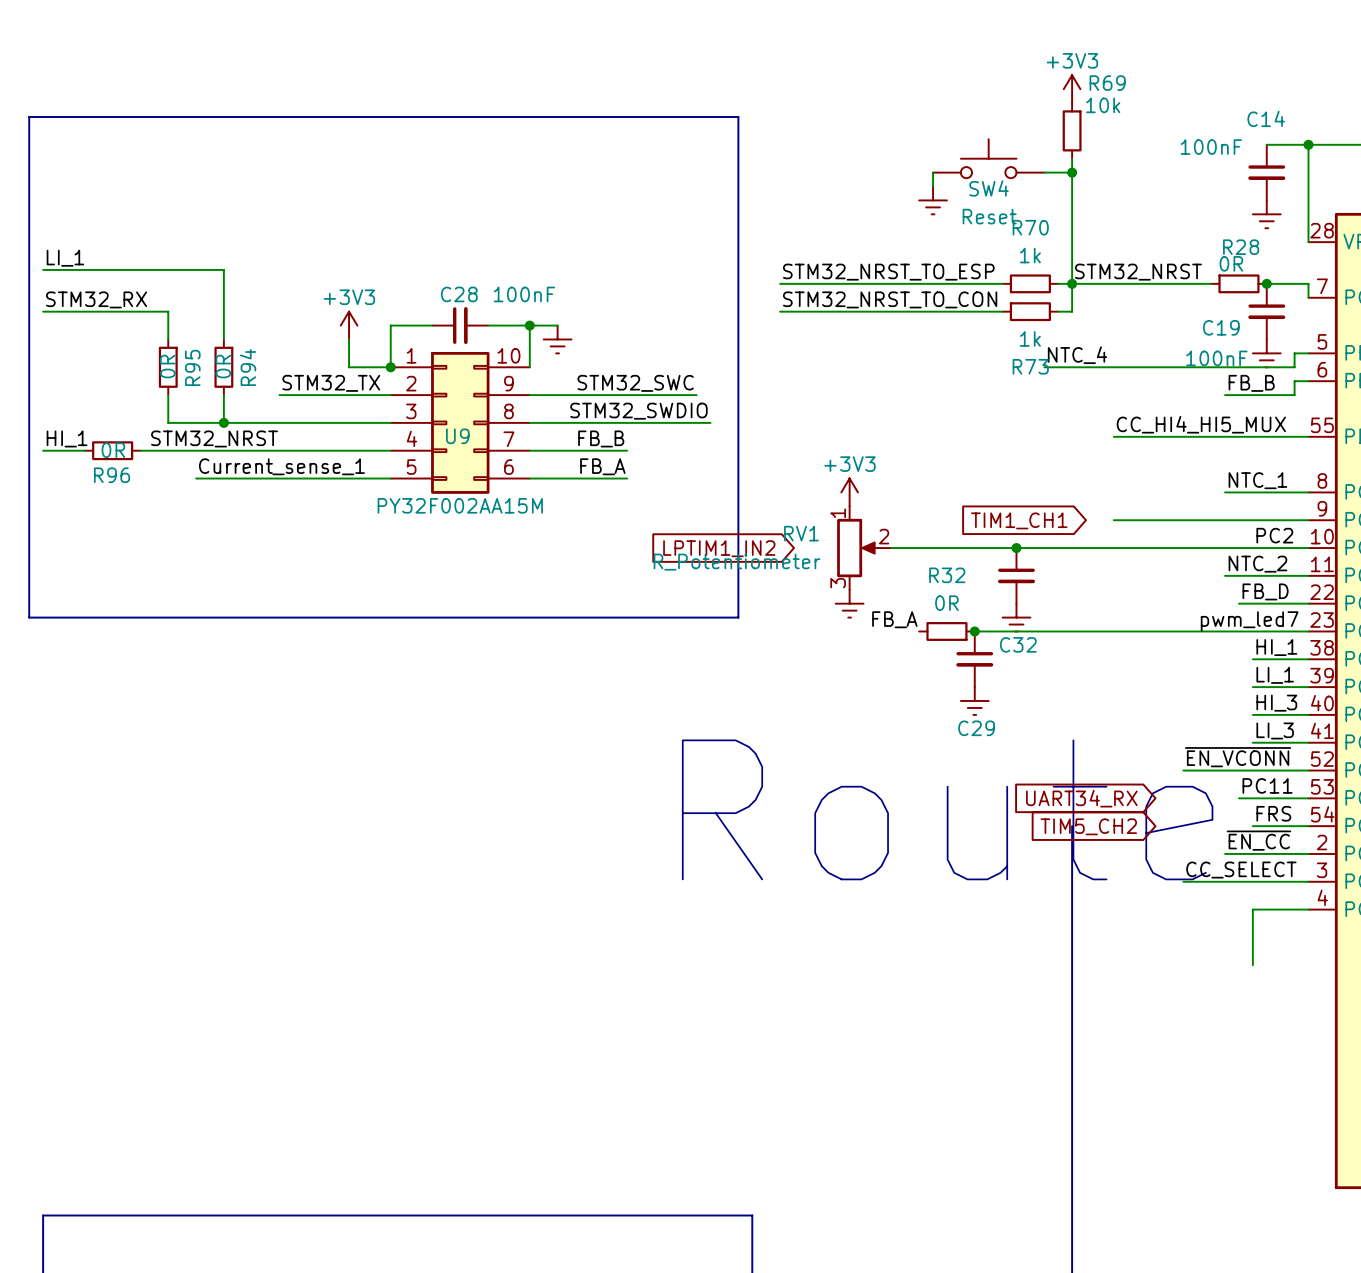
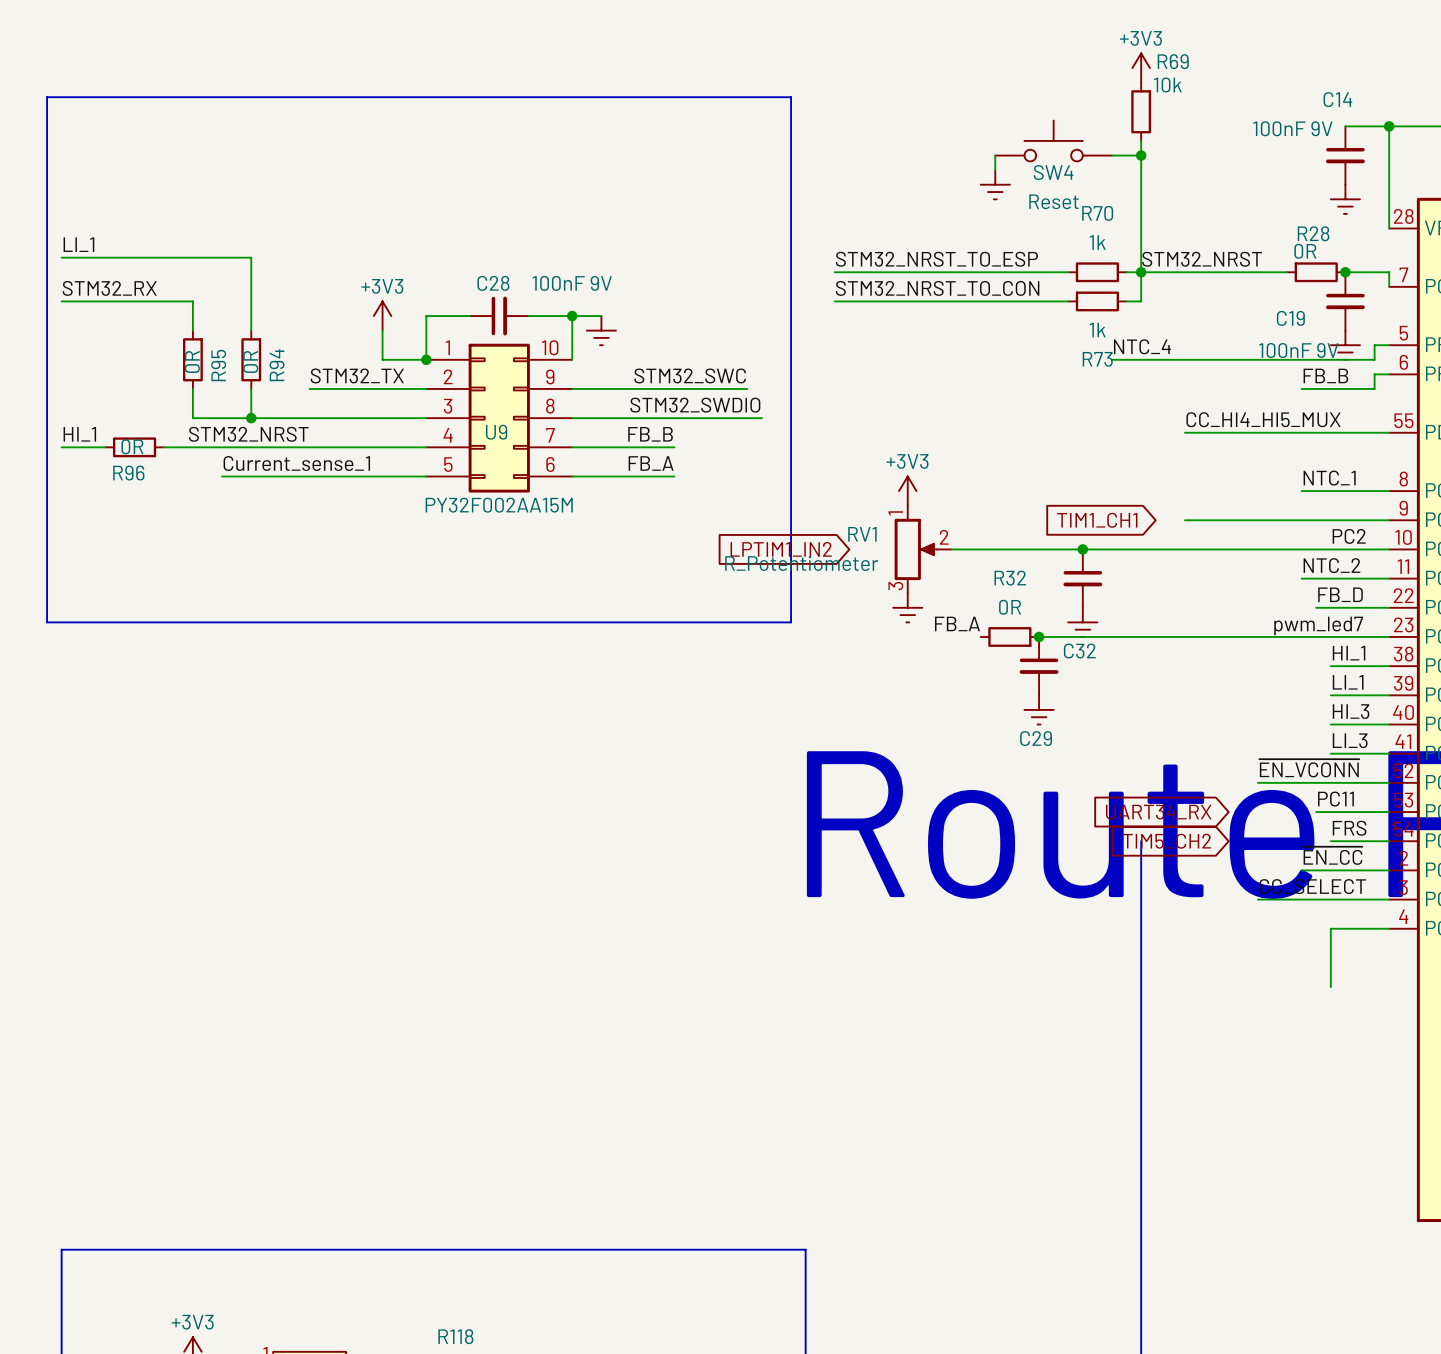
C14 value: 100nF (1211, 147) -> 100nF 9V (1292, 128)
C28 value: 100nF (524, 294) -> 100nF 9V (572, 283)
C19 value: 100nF (1216, 358) -> 100nF 9V (1298, 350)

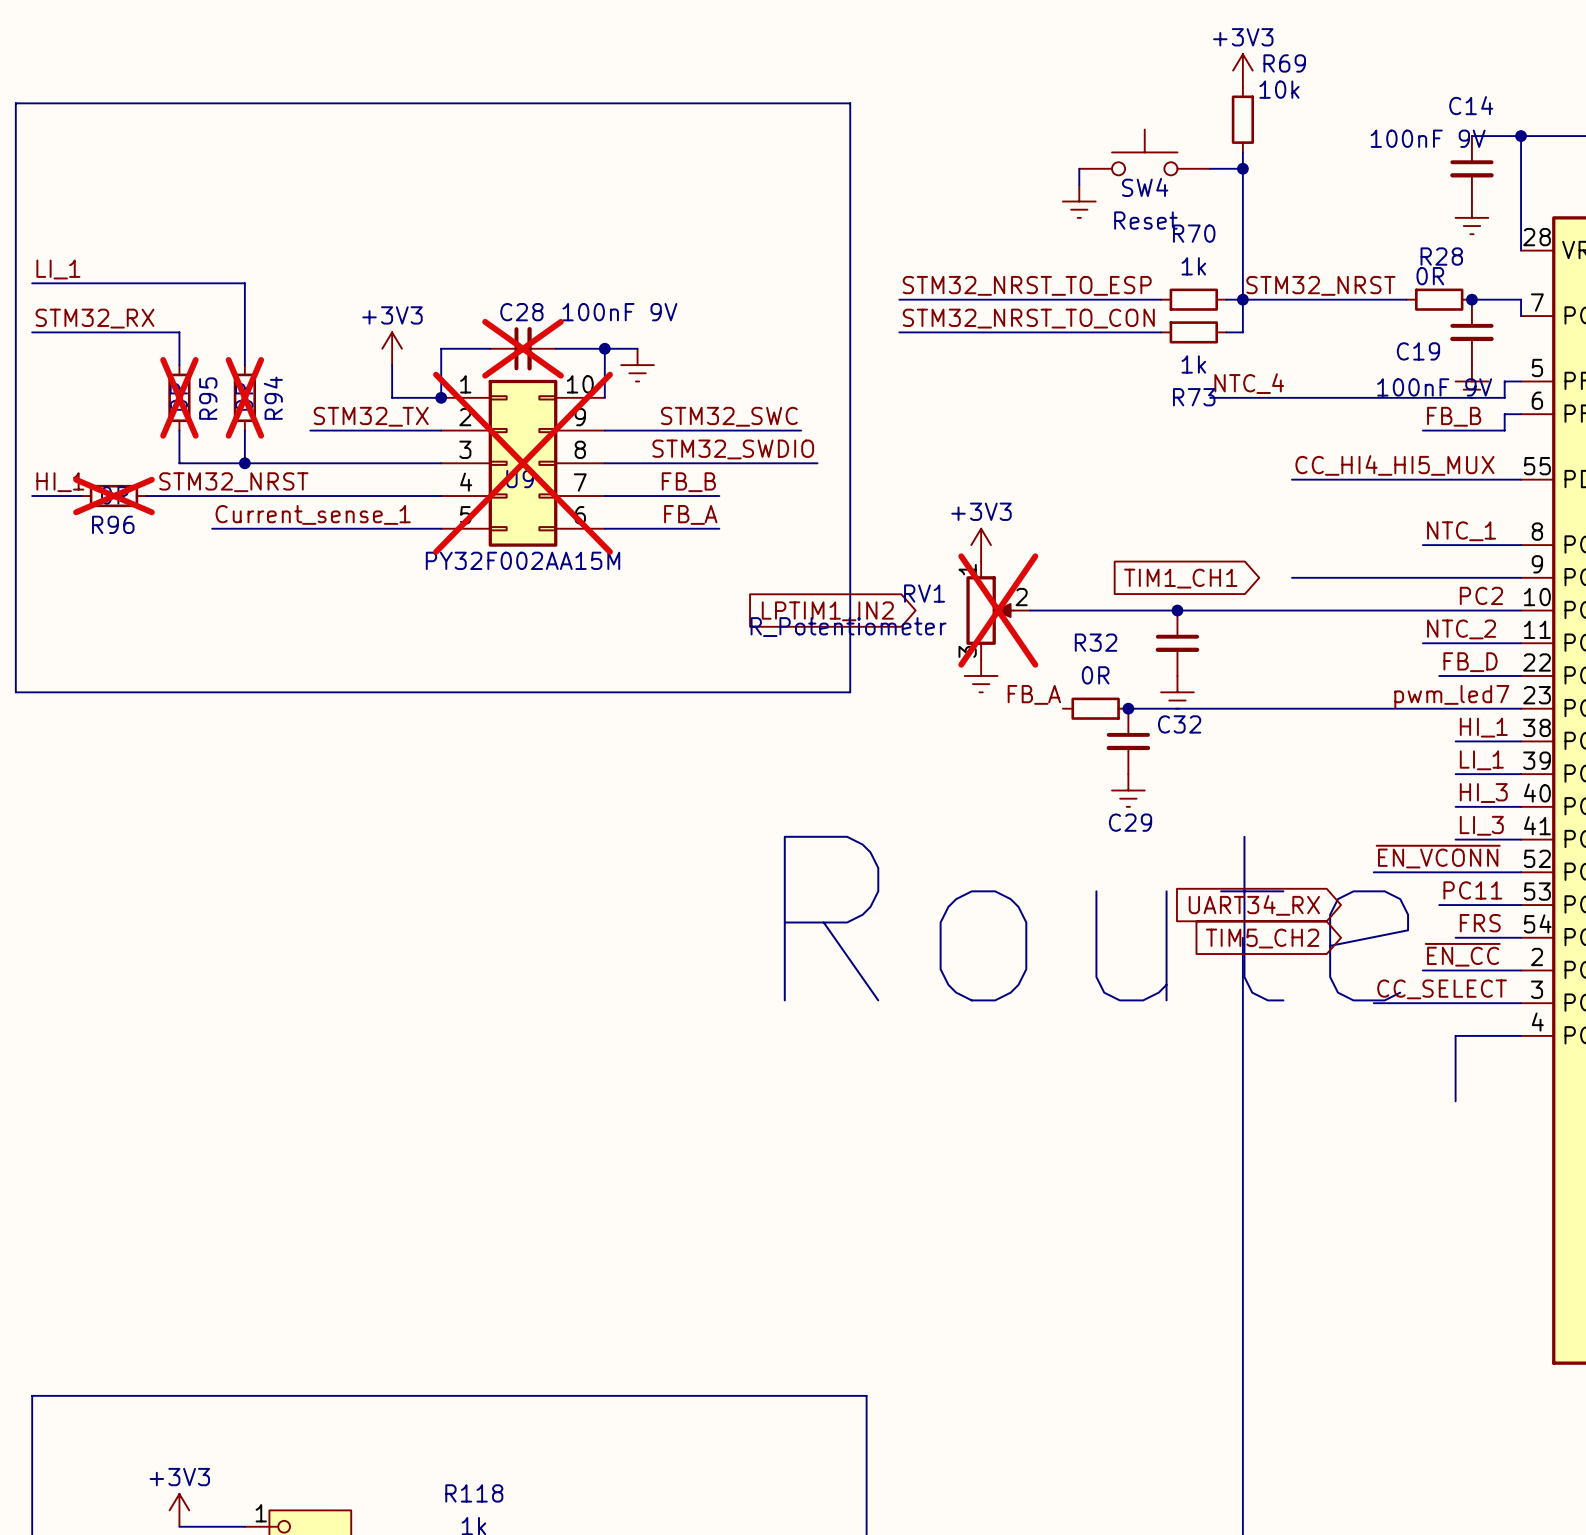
C28 do-not-place cross: none -> (523, 348)
R95 do-not-place cross: none -> (179, 397)
R94 do-not-place cross: none -> (244, 397)
U9 do-not-place cross: none -> (523, 463)
R96 do-not-place cross: none -> (113, 496)
RV1 do-not-place cross: none -> (998, 610)

